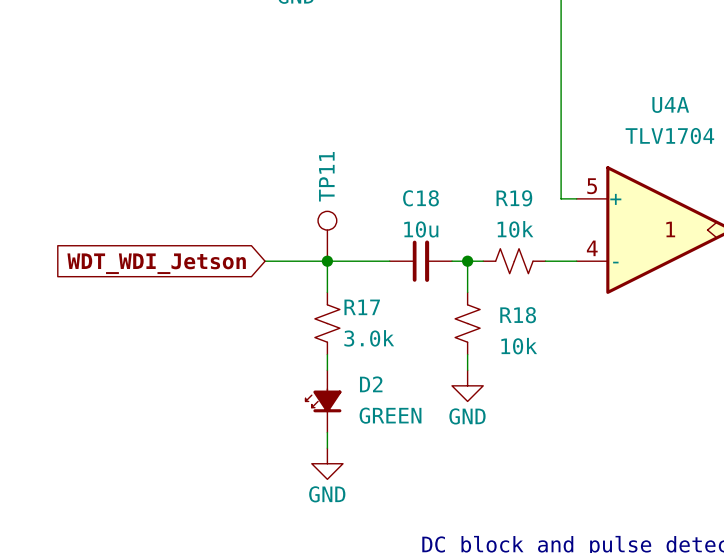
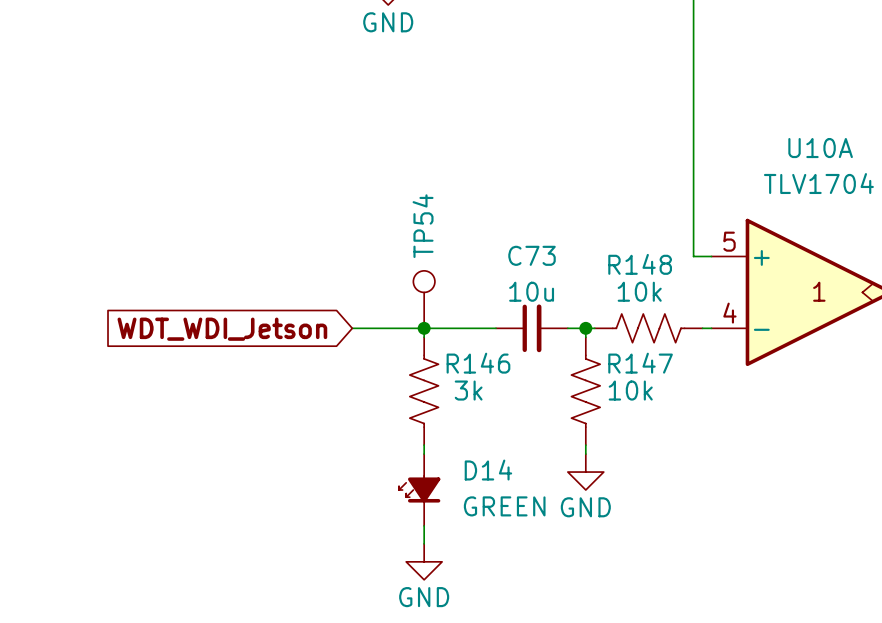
U4A name: U4A (670, 104) -> U10A (820, 148)
TP11 name: TP11 (326, 176) -> TP54 (423, 226)
C18 name: C18 (420, 198) -> C73 (532, 255)
R19: 10k (514, 261) -> none
R148: none -> 10k (648, 328)
R146: none -> 3k (424, 391)
R147: none -> 10k (585, 391)
R17: 3.0k (327, 323) -> none
R18: 10k (467, 323) -> none
D2 name: D2 (371, 384) -> D14 (488, 470)

